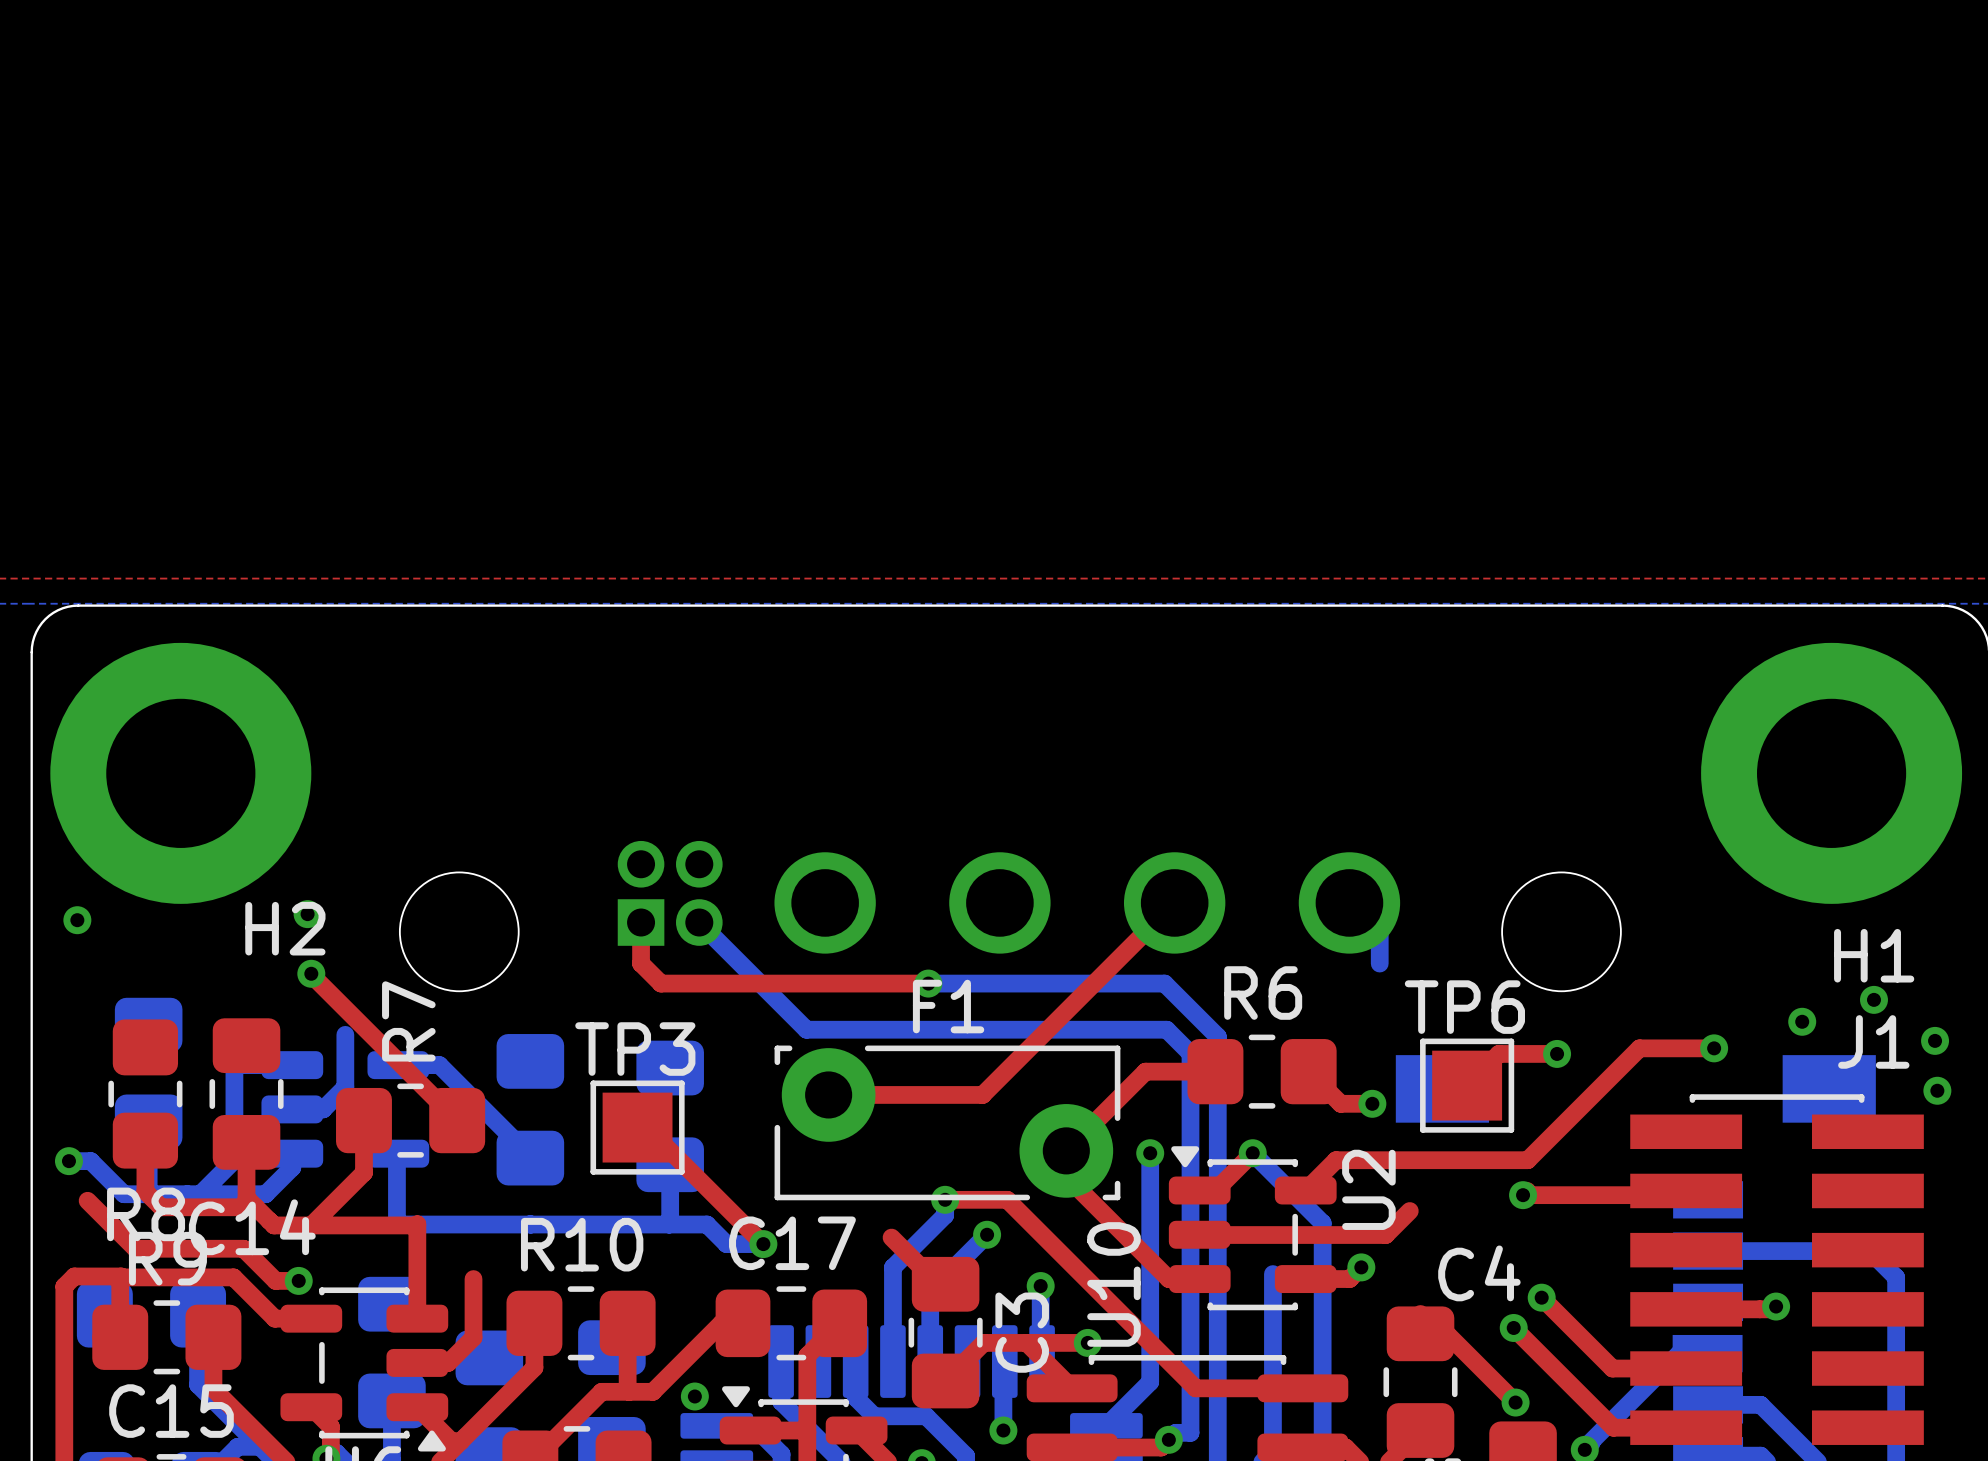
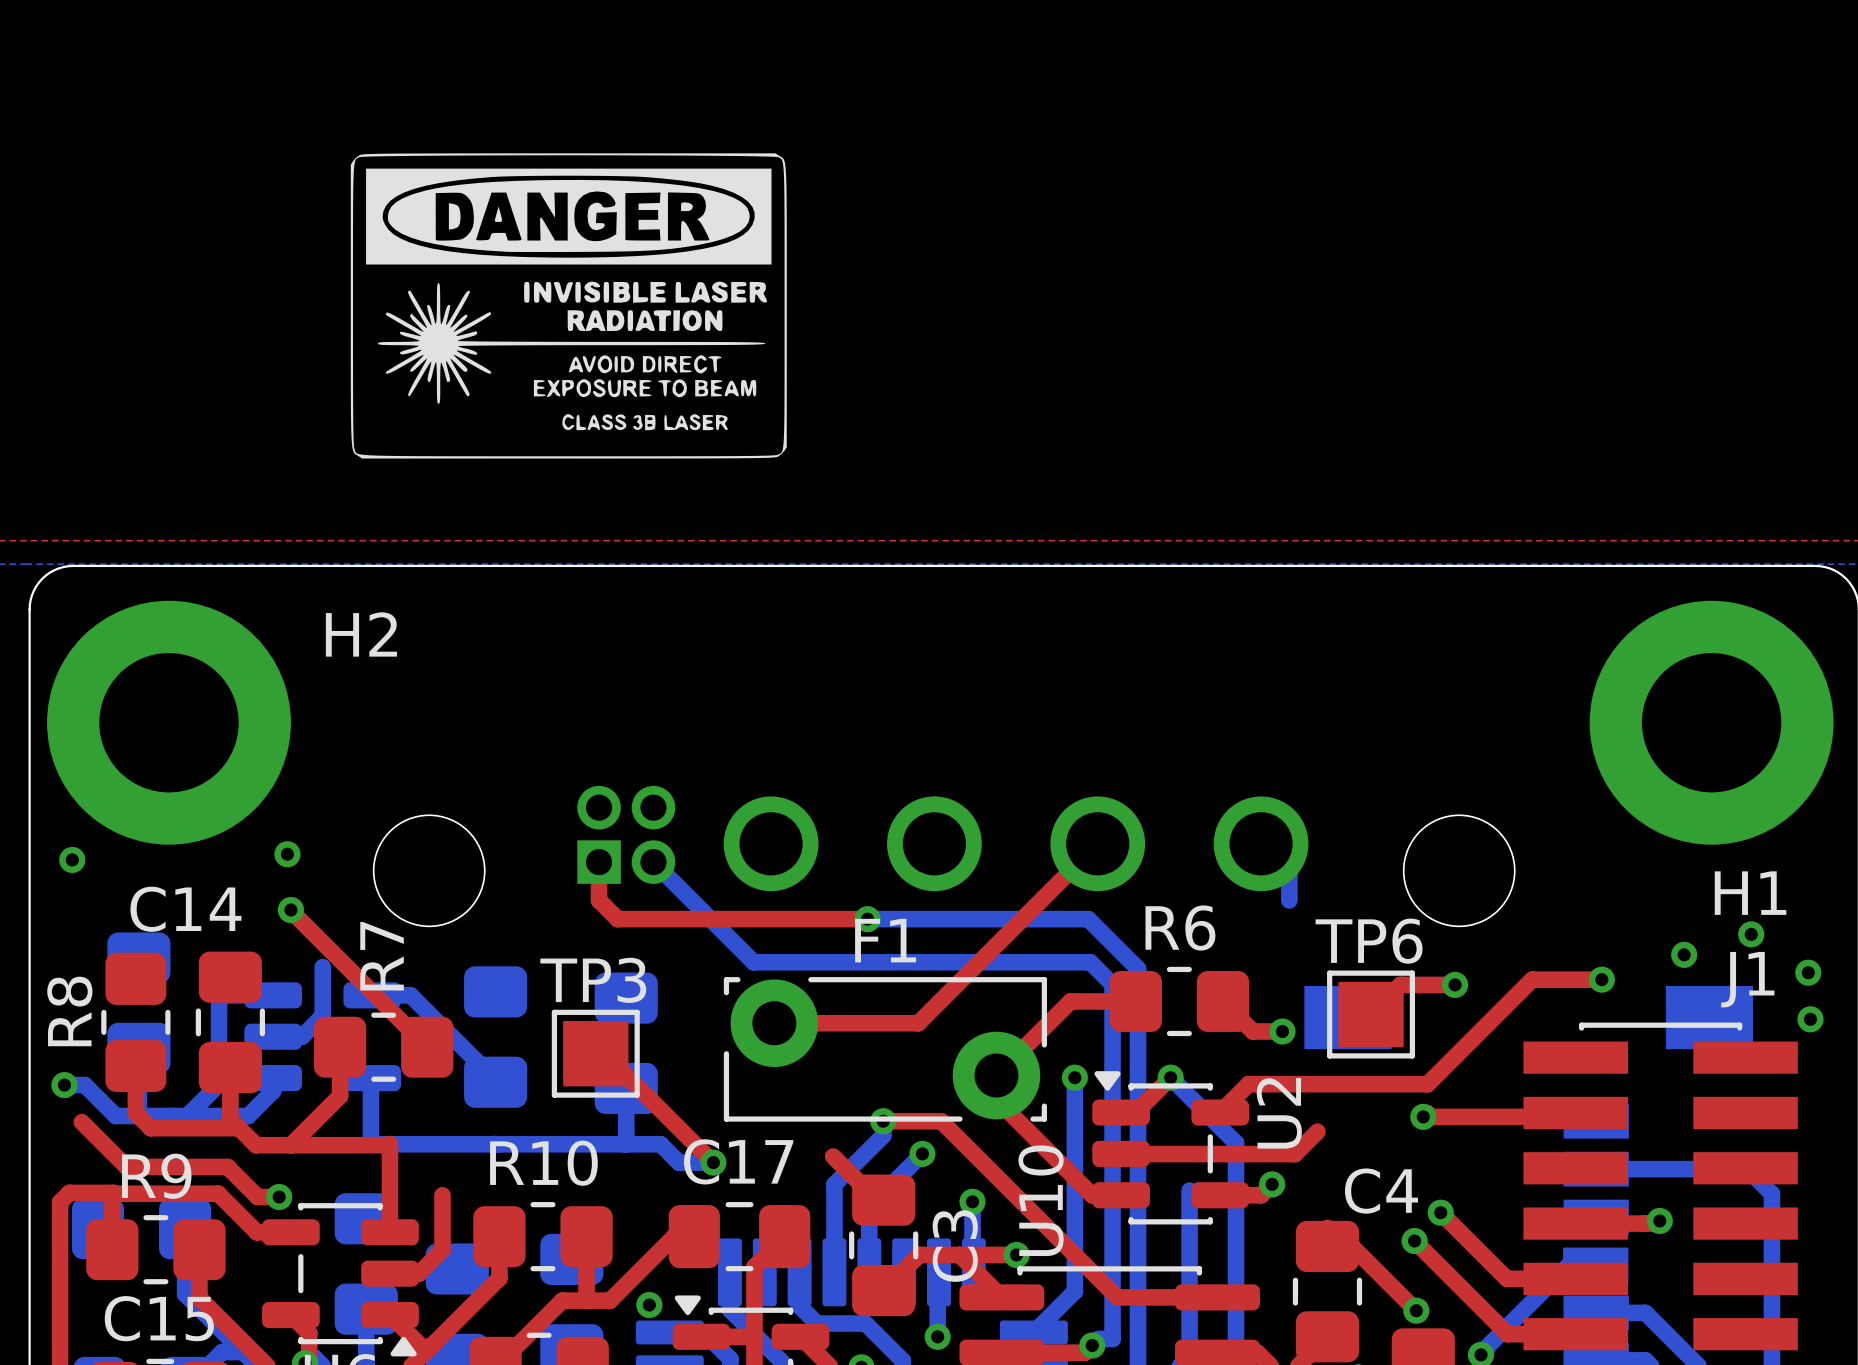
drawing: none -> [350, 153, 787, 459]
H2 name position: H2 (285, 928) -> H2 (361, 634)
R8 name rotation: 0° (146, 1214) -> 90° counterclockwise (69, 1011)
R8 name position: R8 (146, 1214) -> R8 (69, 1011)
C14 name position: C14 (252, 1227) -> C14 (185, 909)

